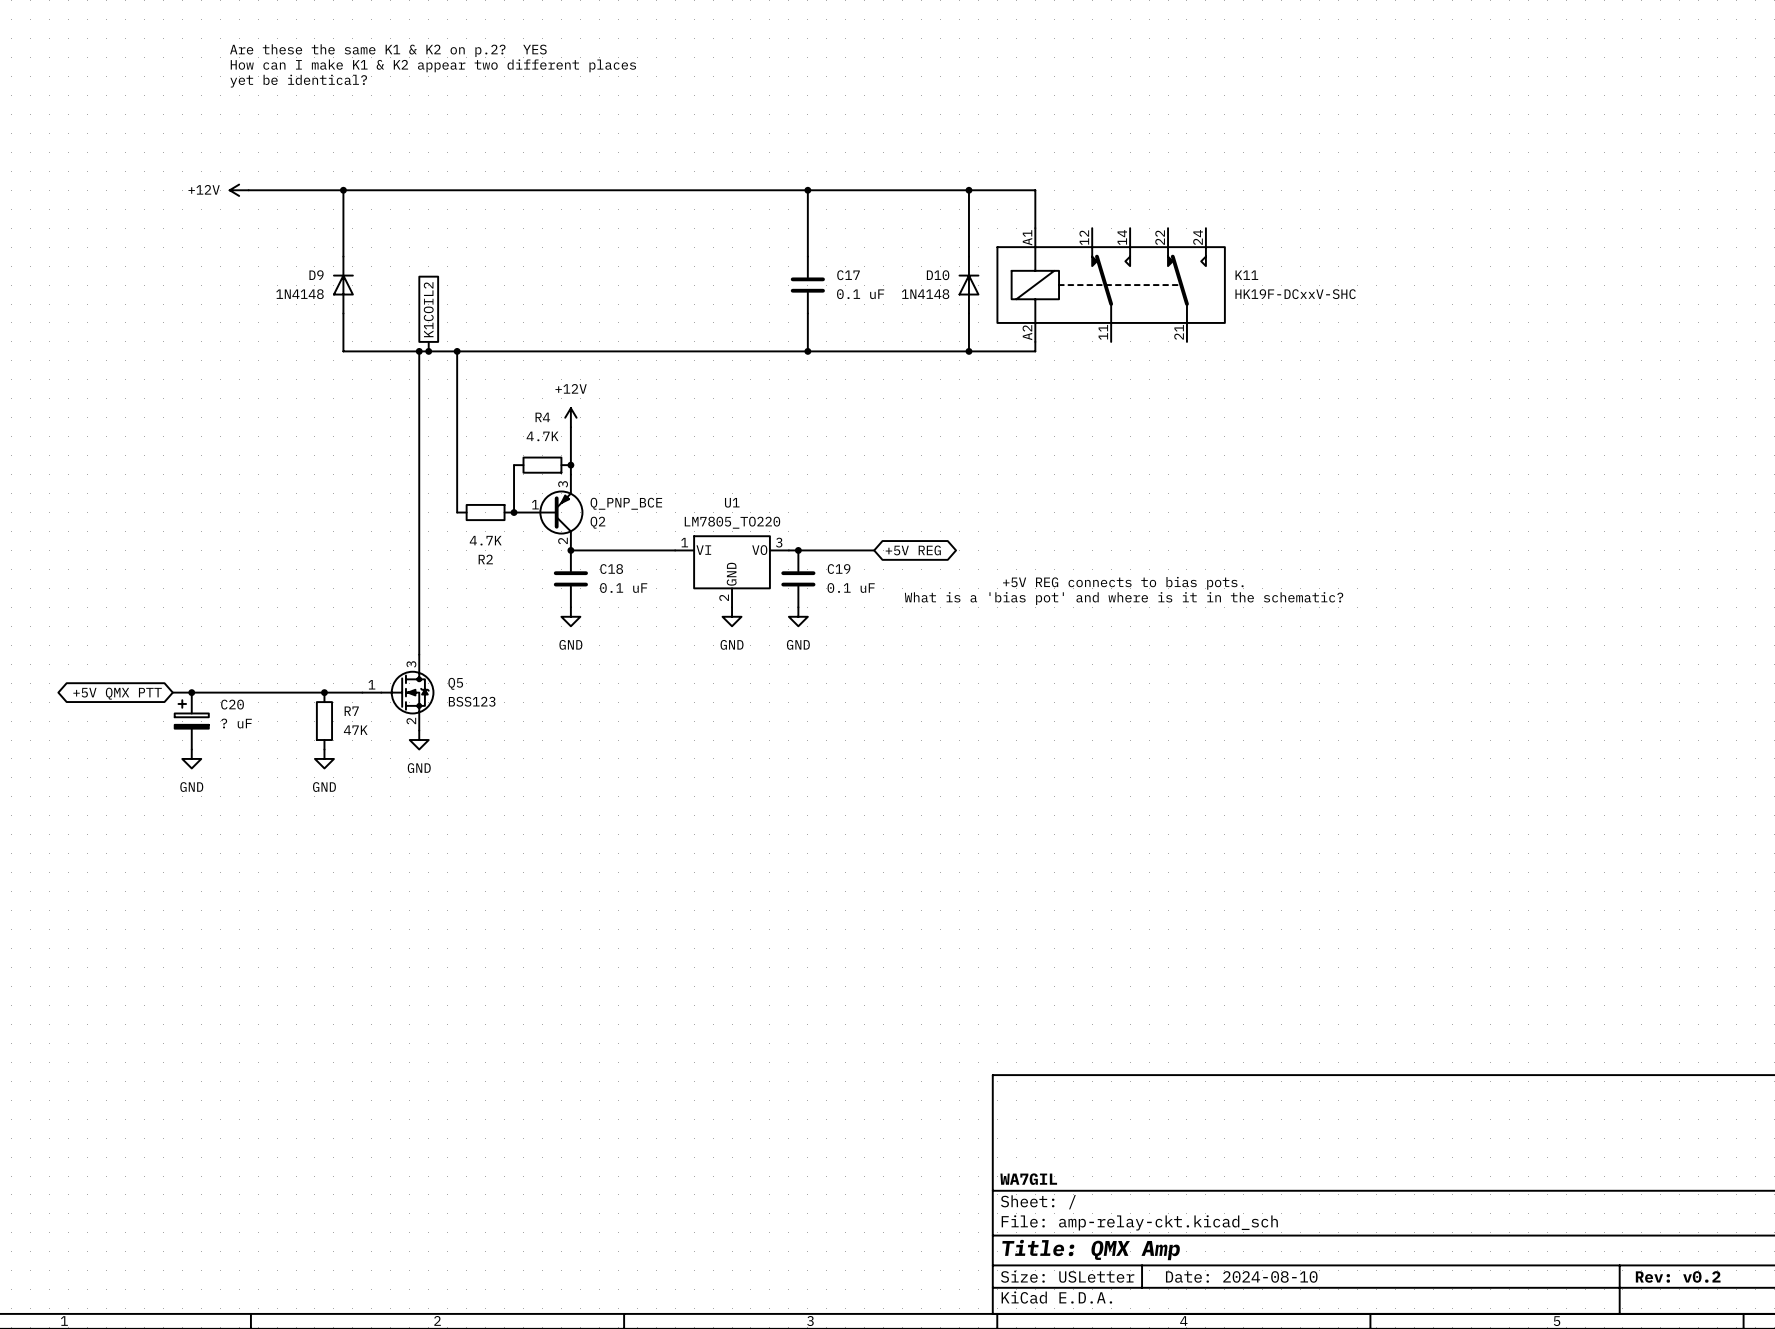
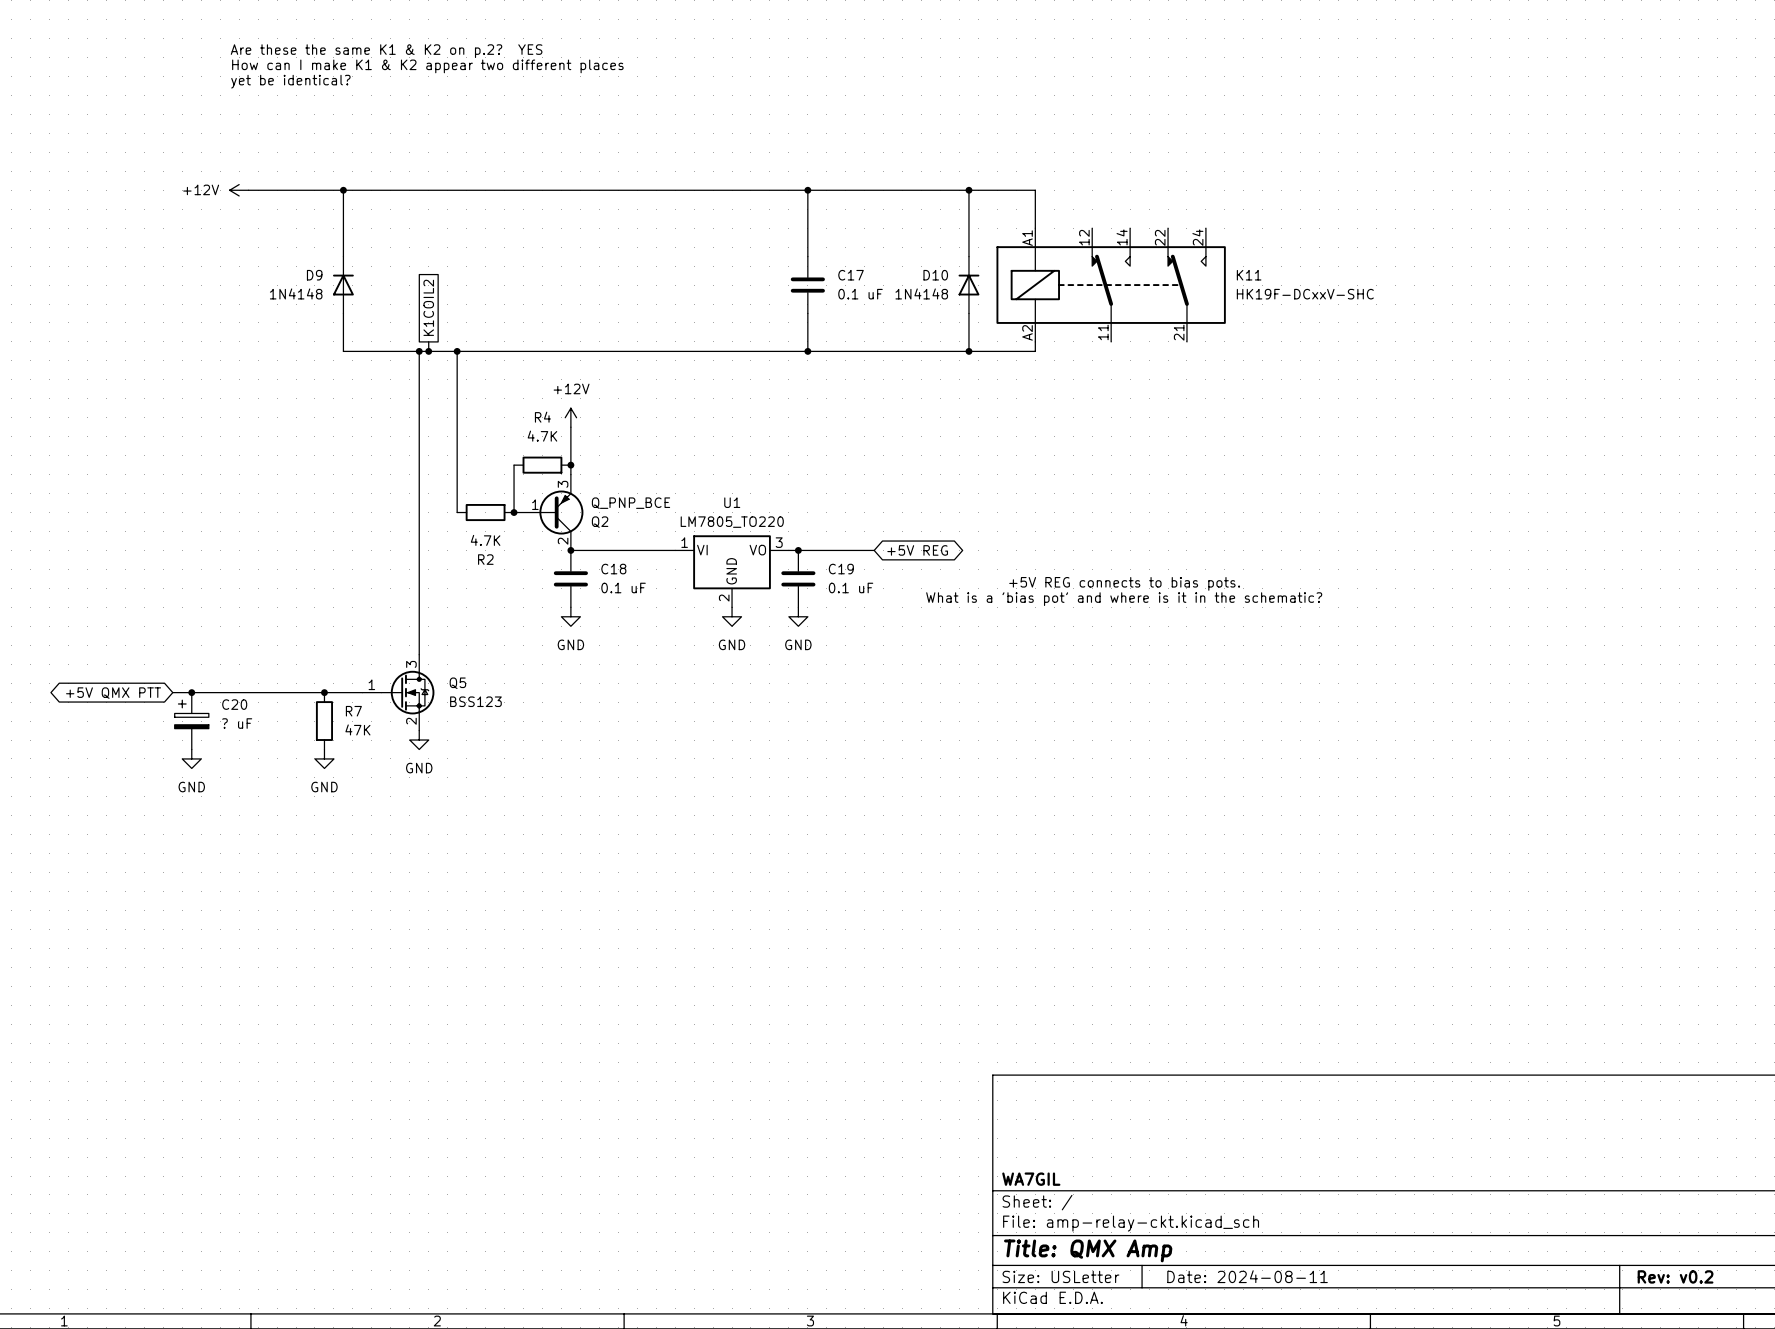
title block: Date: 2024-08-10 (1241, 1276) -> Date: 2024-08-11 (1247, 1276)

